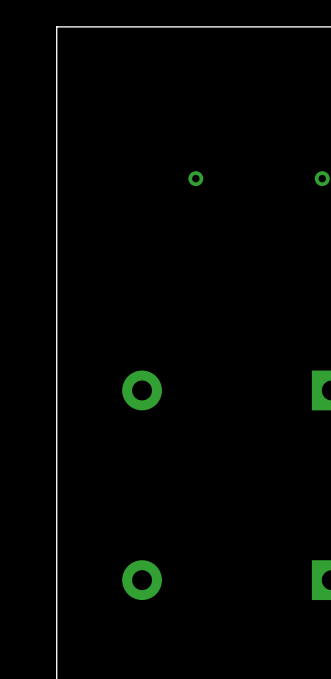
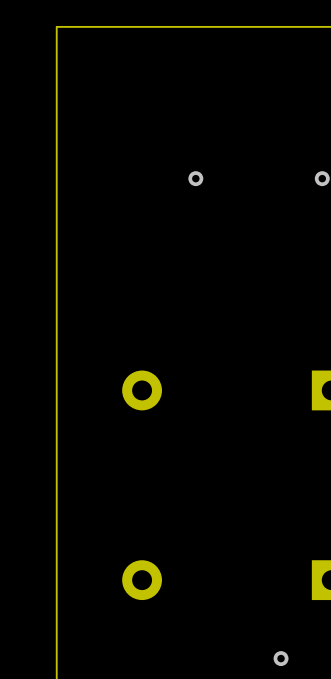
via: none -> (281, 658)

